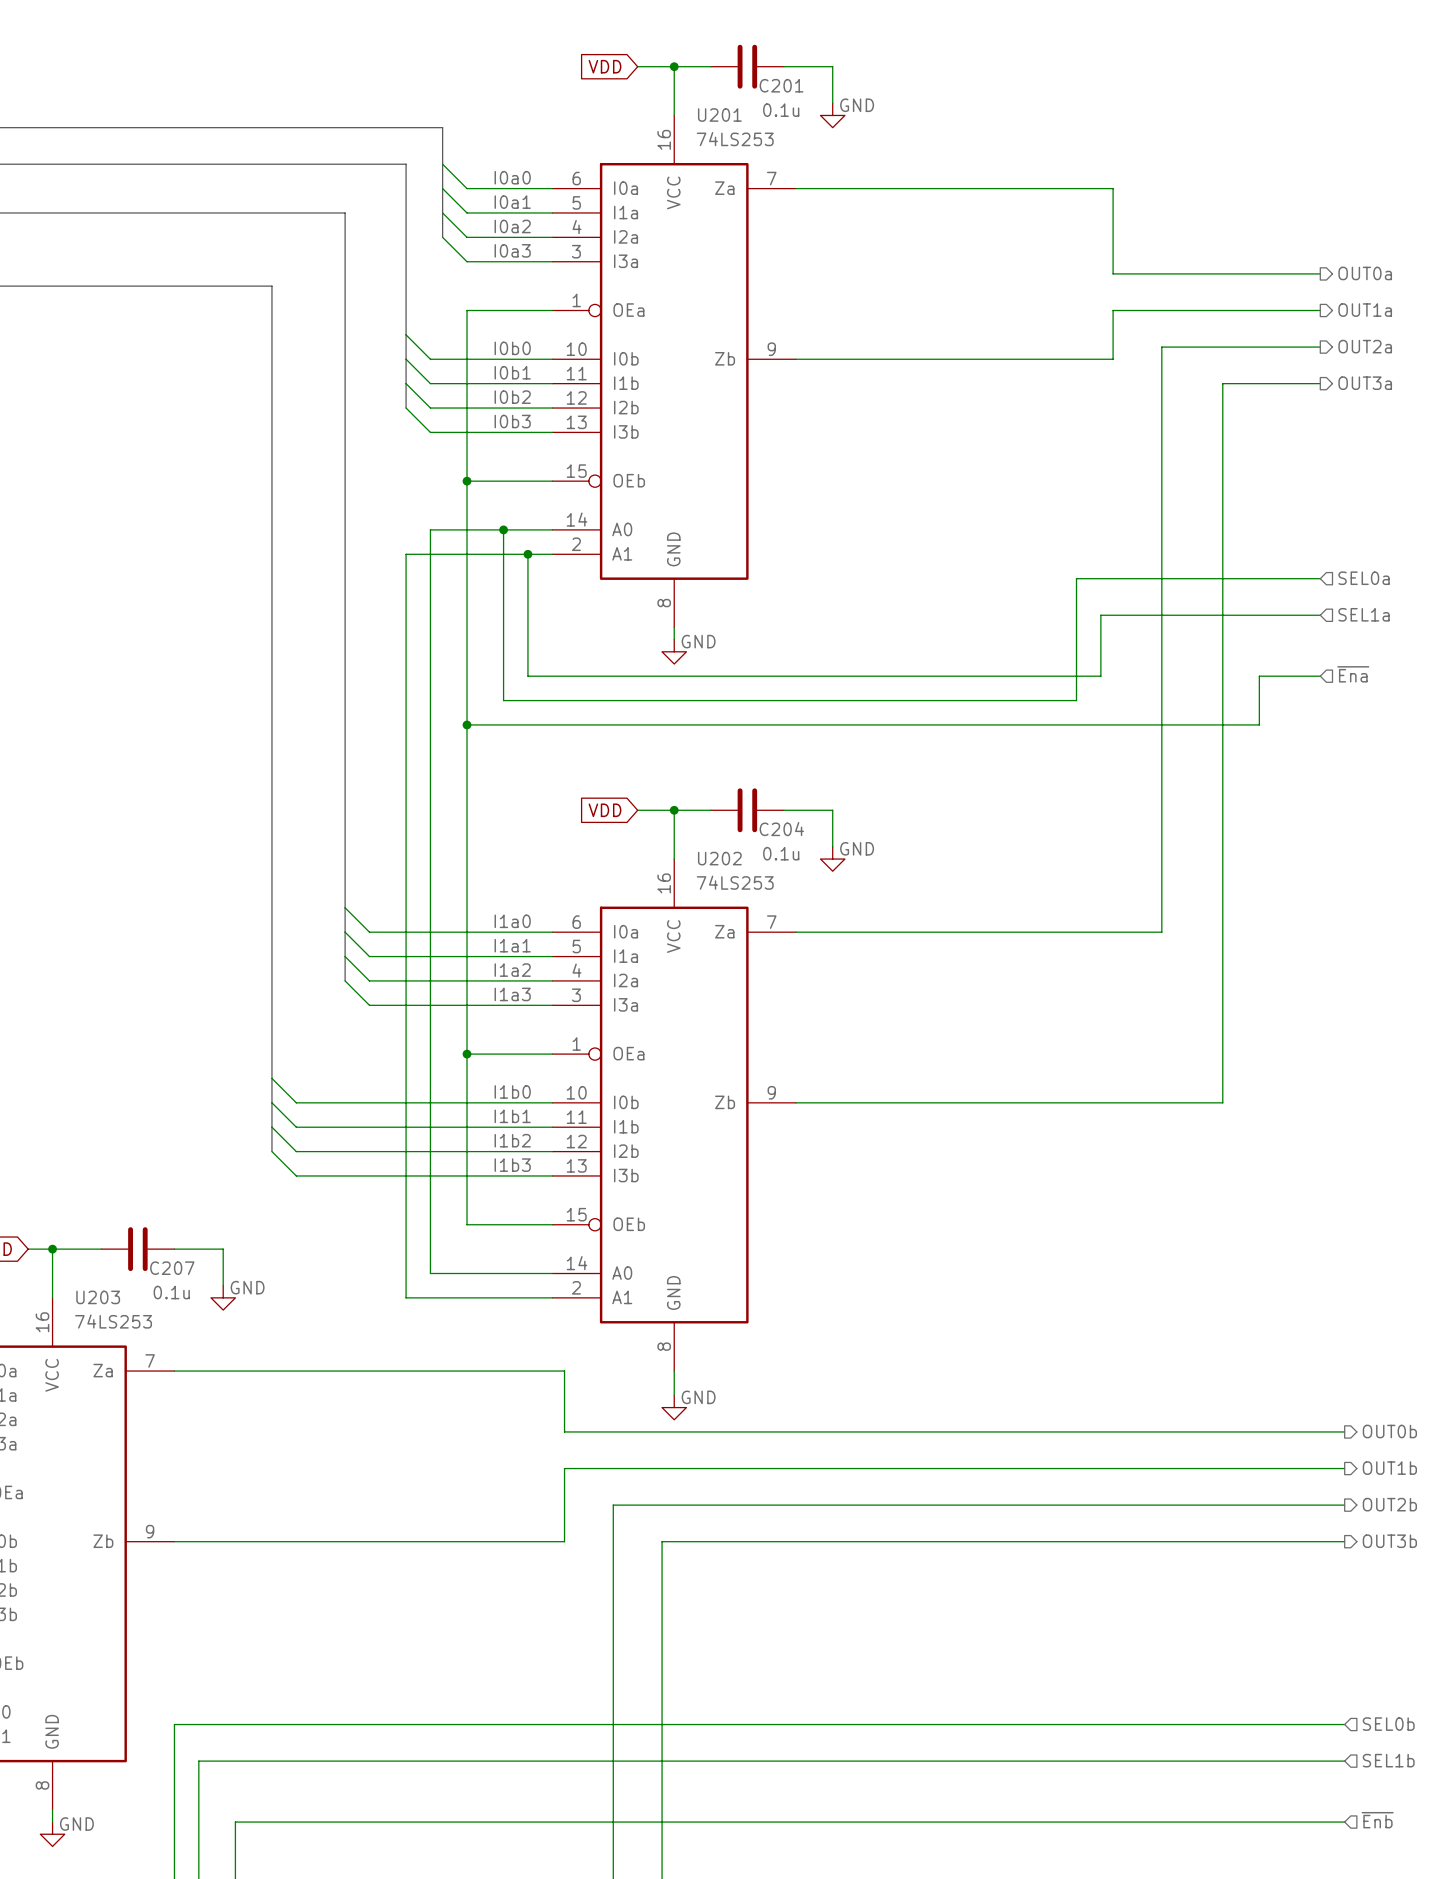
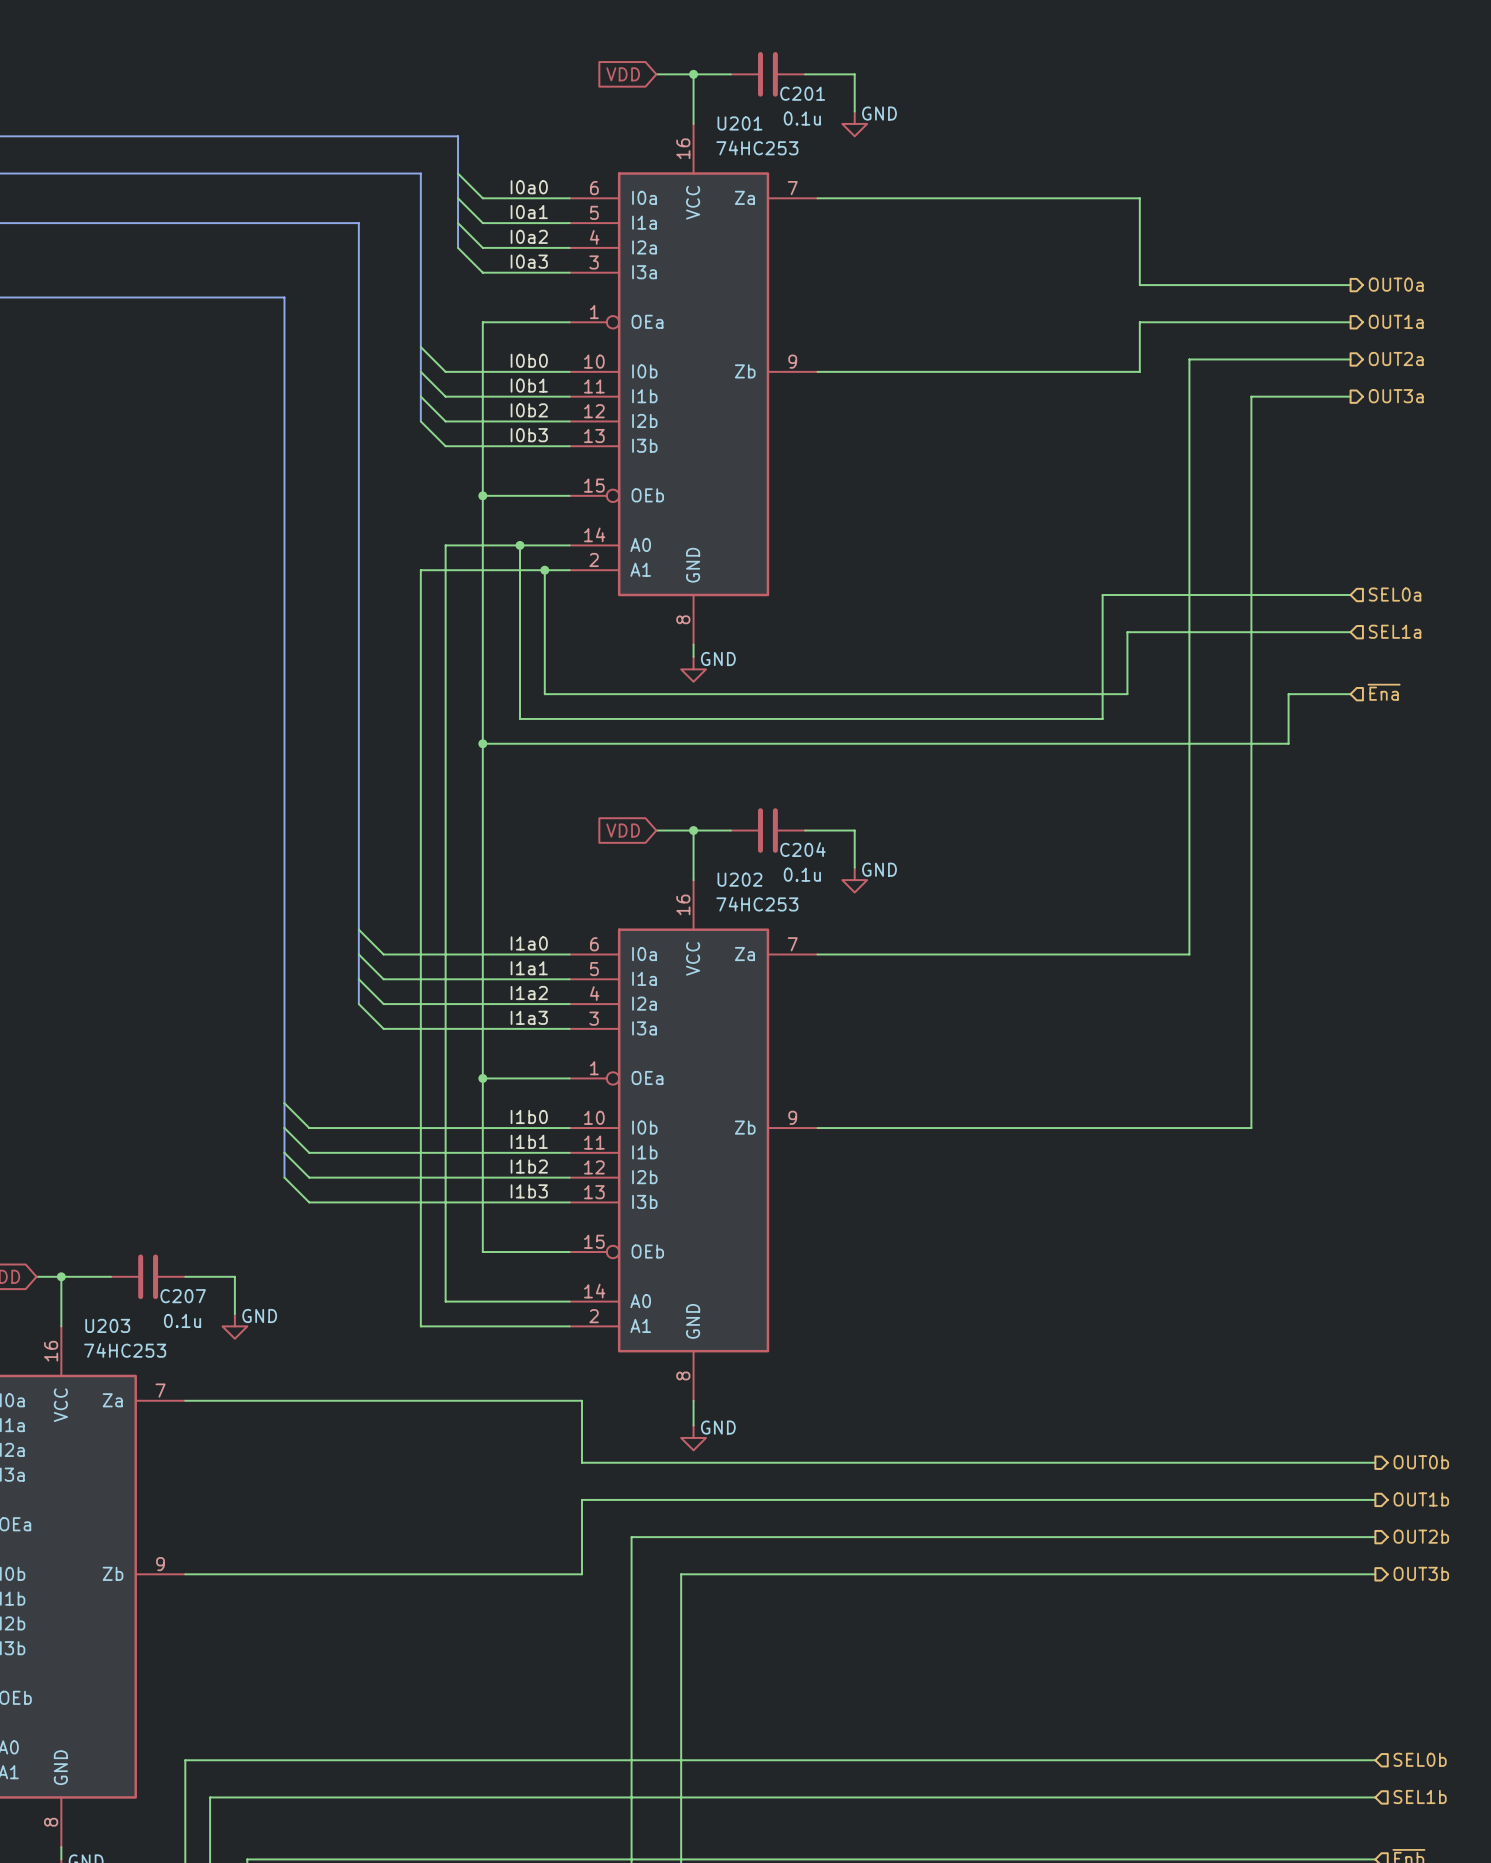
U201 value: 74LS253 (735, 139) -> 74HC253 (757, 147)
U202 value: 74LS253 (735, 882) -> 74HC253 (757, 904)
U203 value: 74LS253 (113, 1321) -> 74HC253 (125, 1350)

